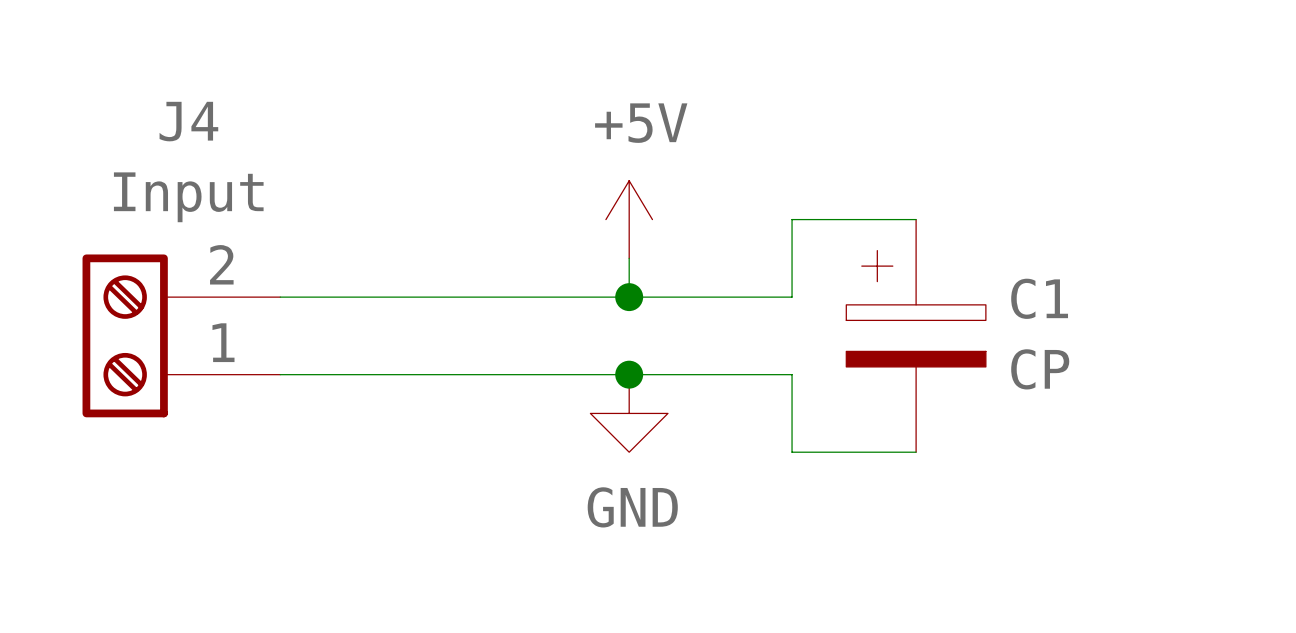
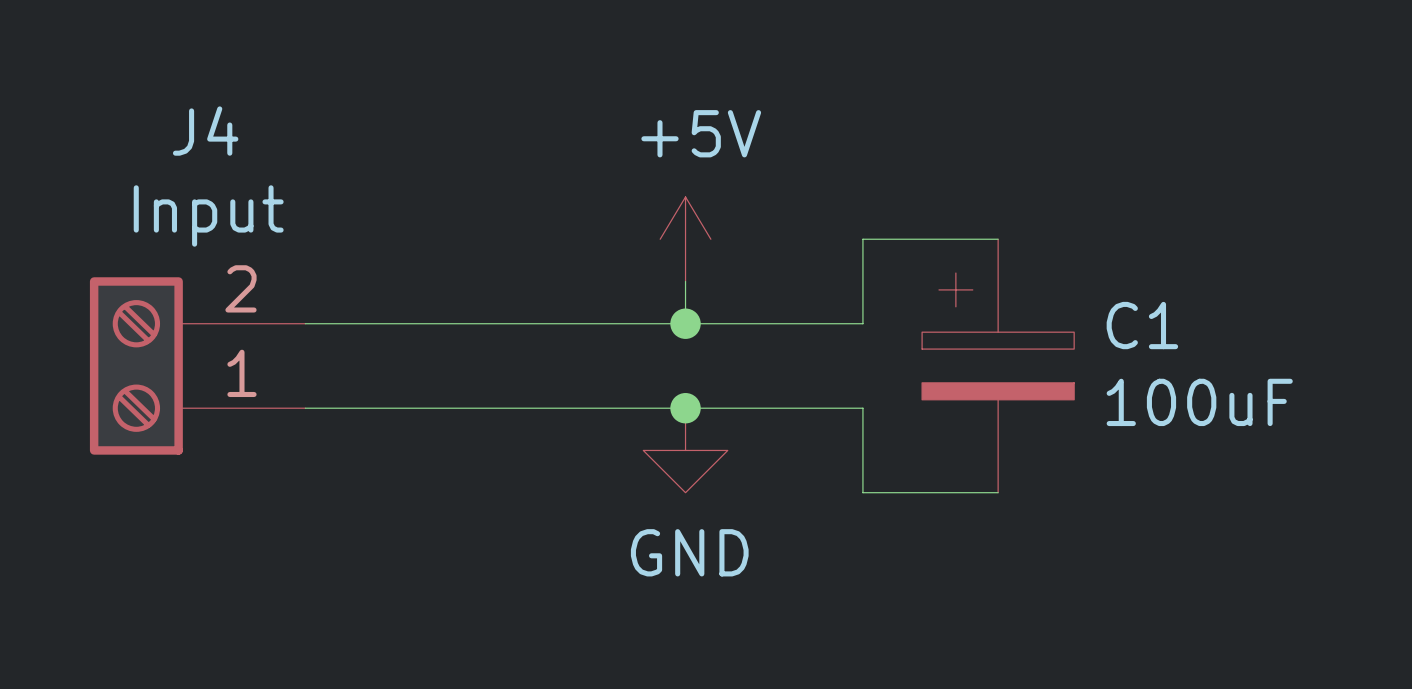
C1 value: CP (1040, 369) -> 100uF (1199, 402)

